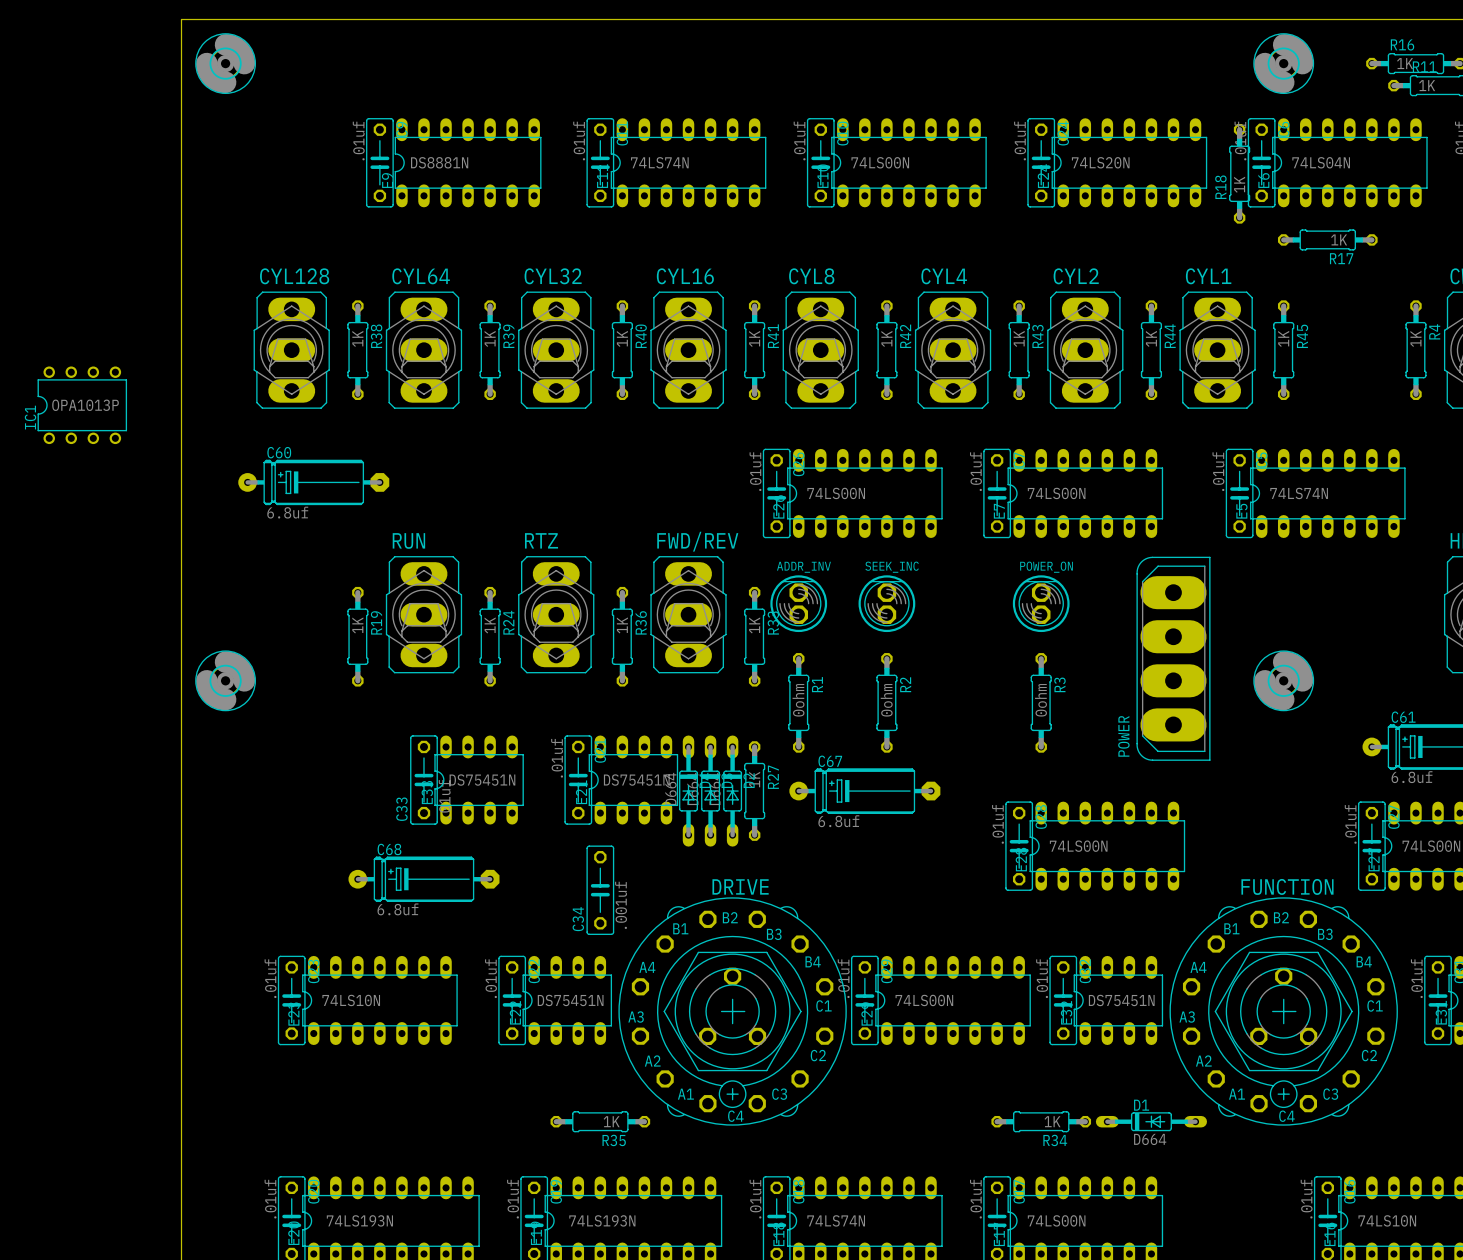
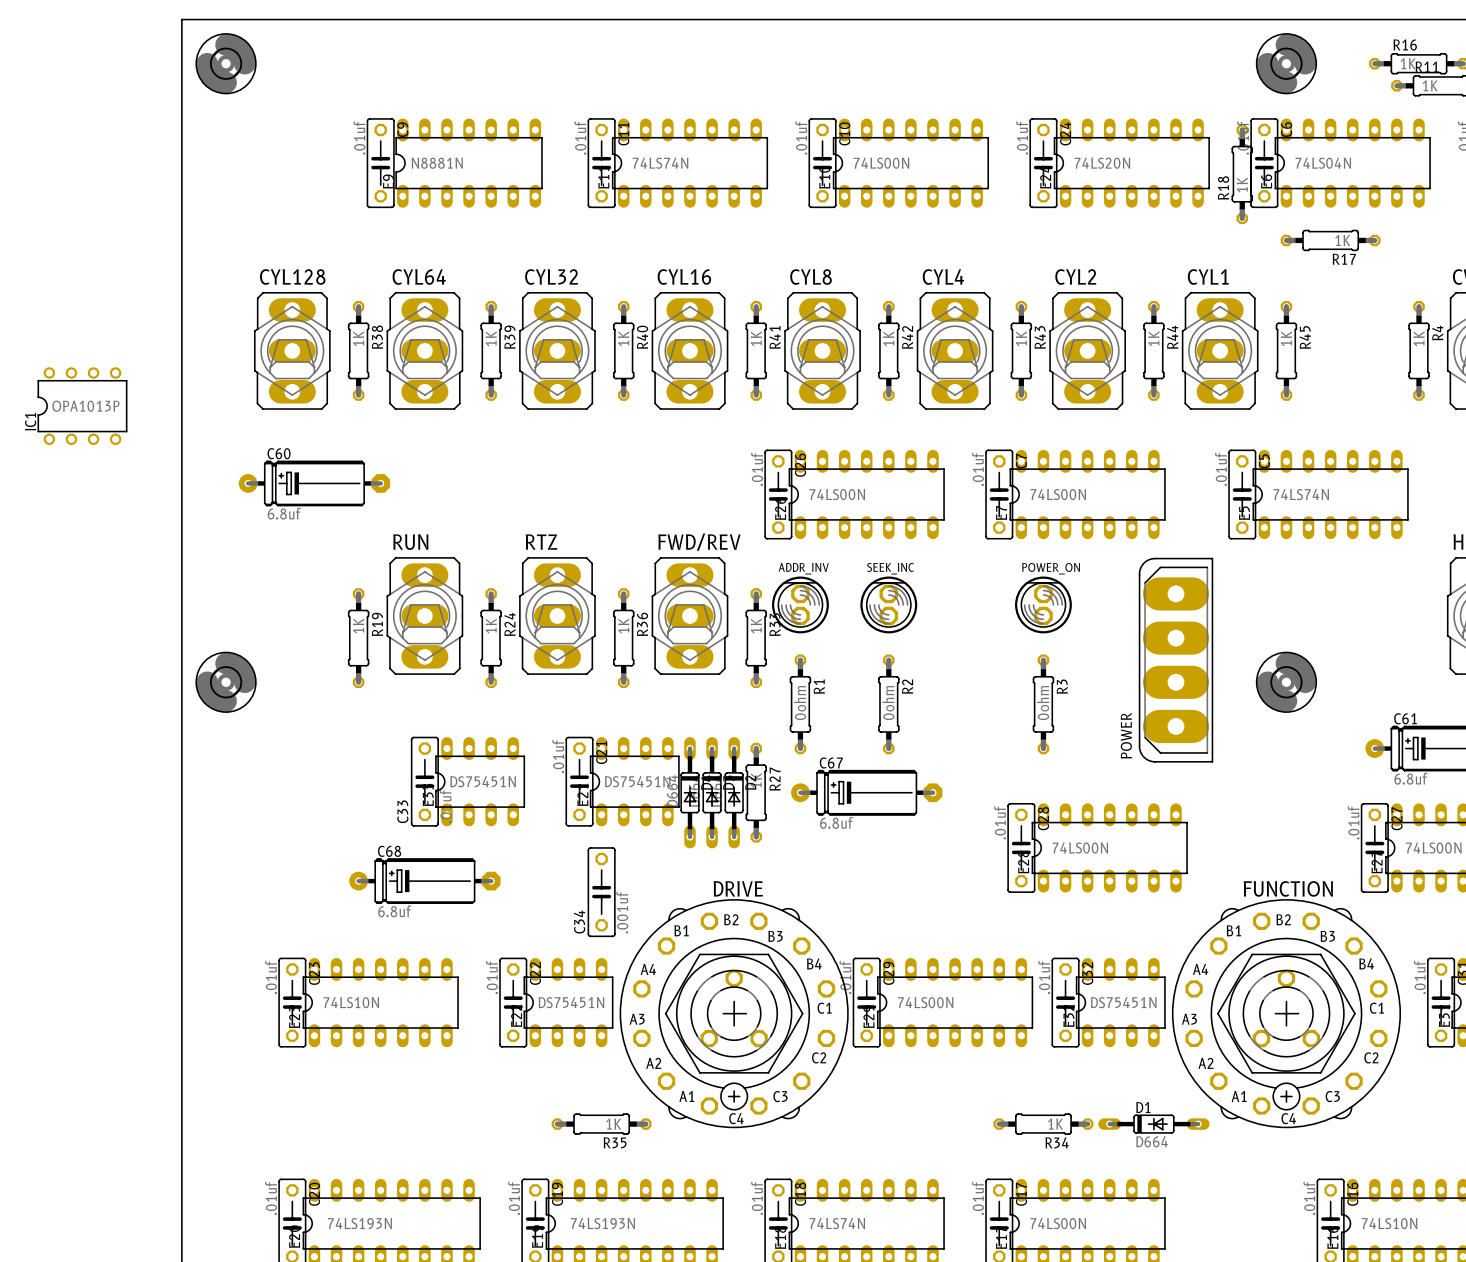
E9 value: DS8881N (439, 162) -> N8881N (437, 163)

